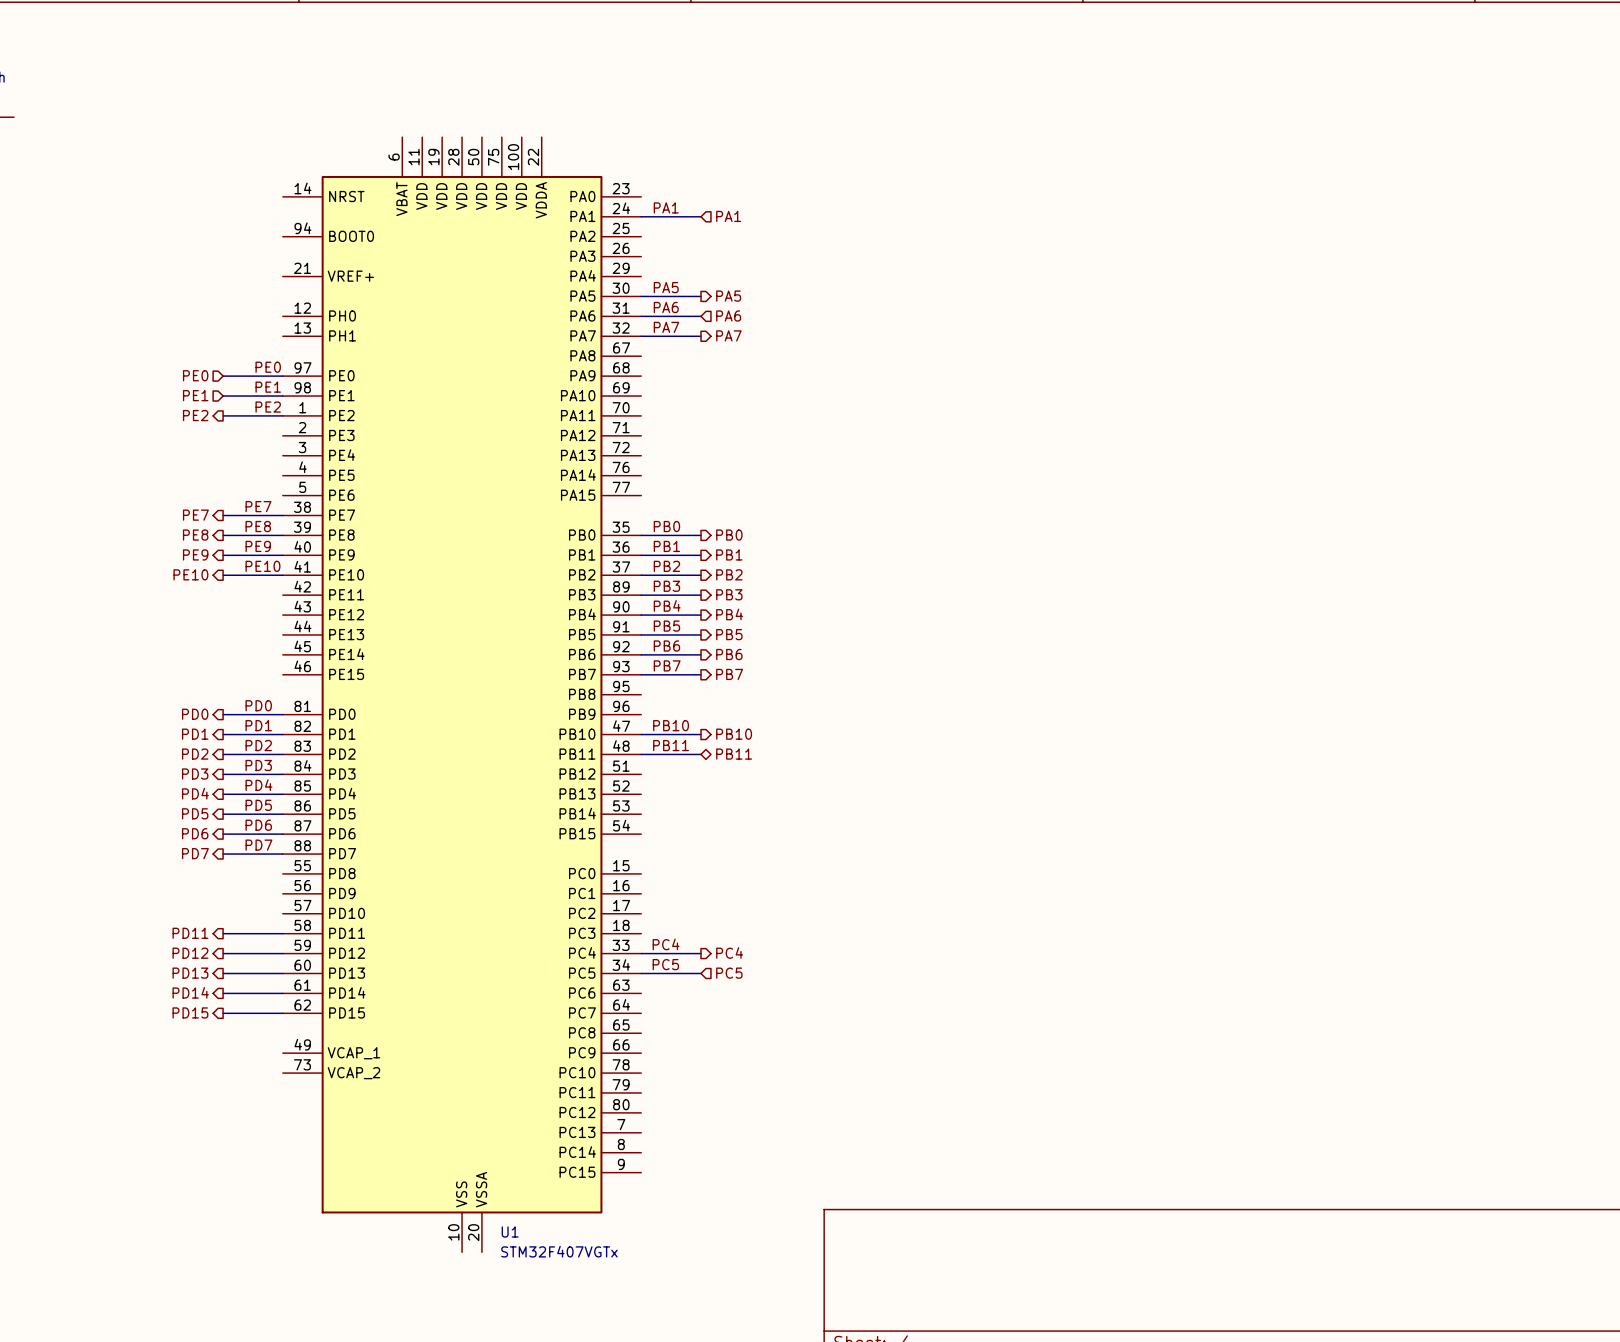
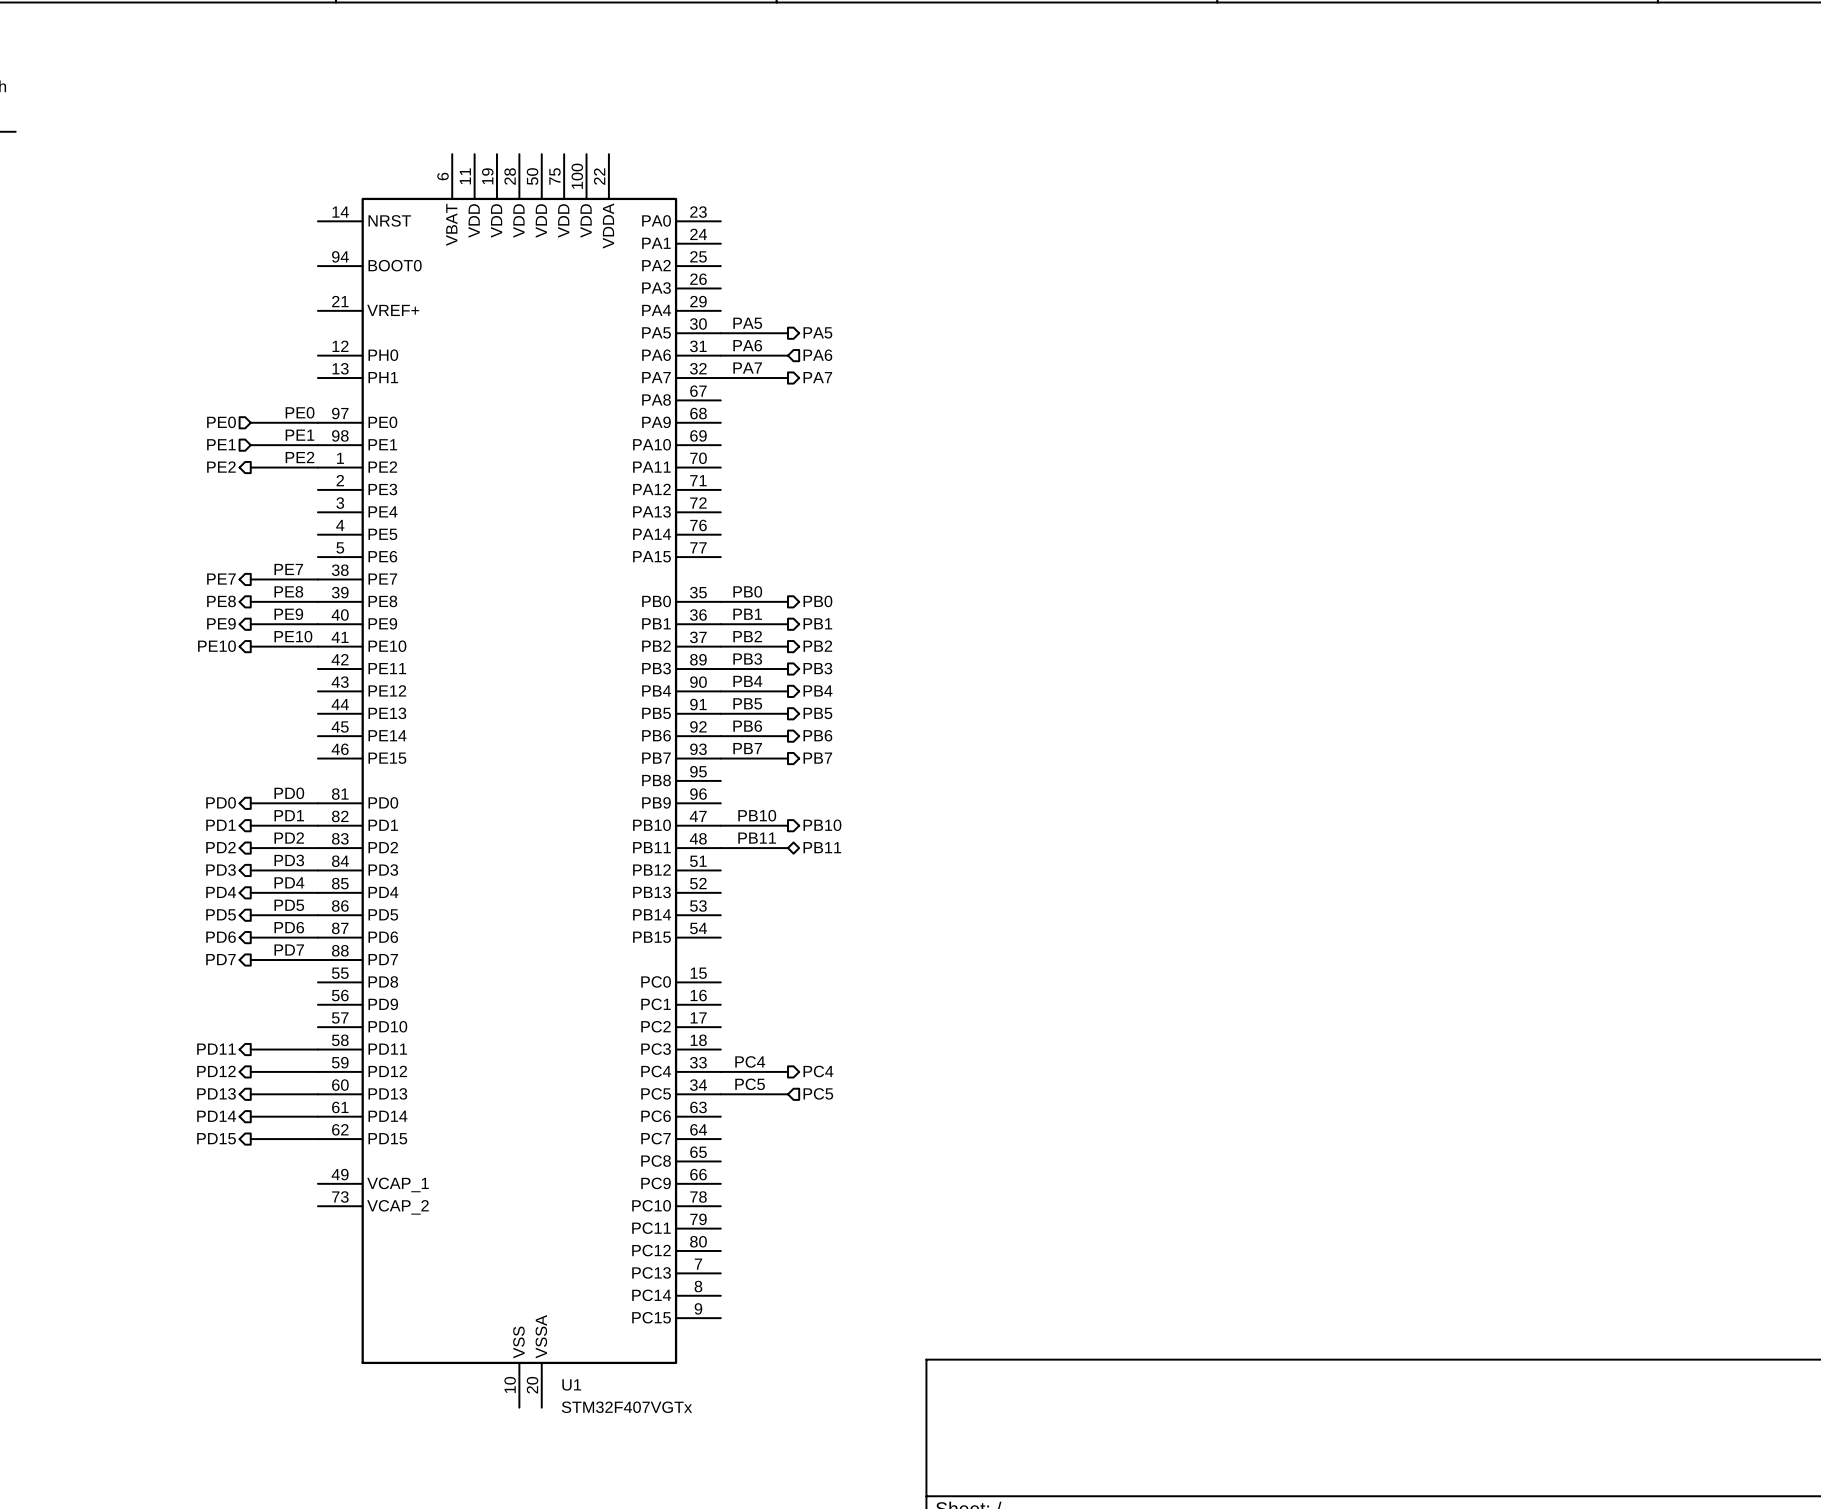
label: PA1 (666, 207) -> none
wire: (641, 216) (700, 216) -> none
hierarchical label: PA1 (728, 216) -> none

